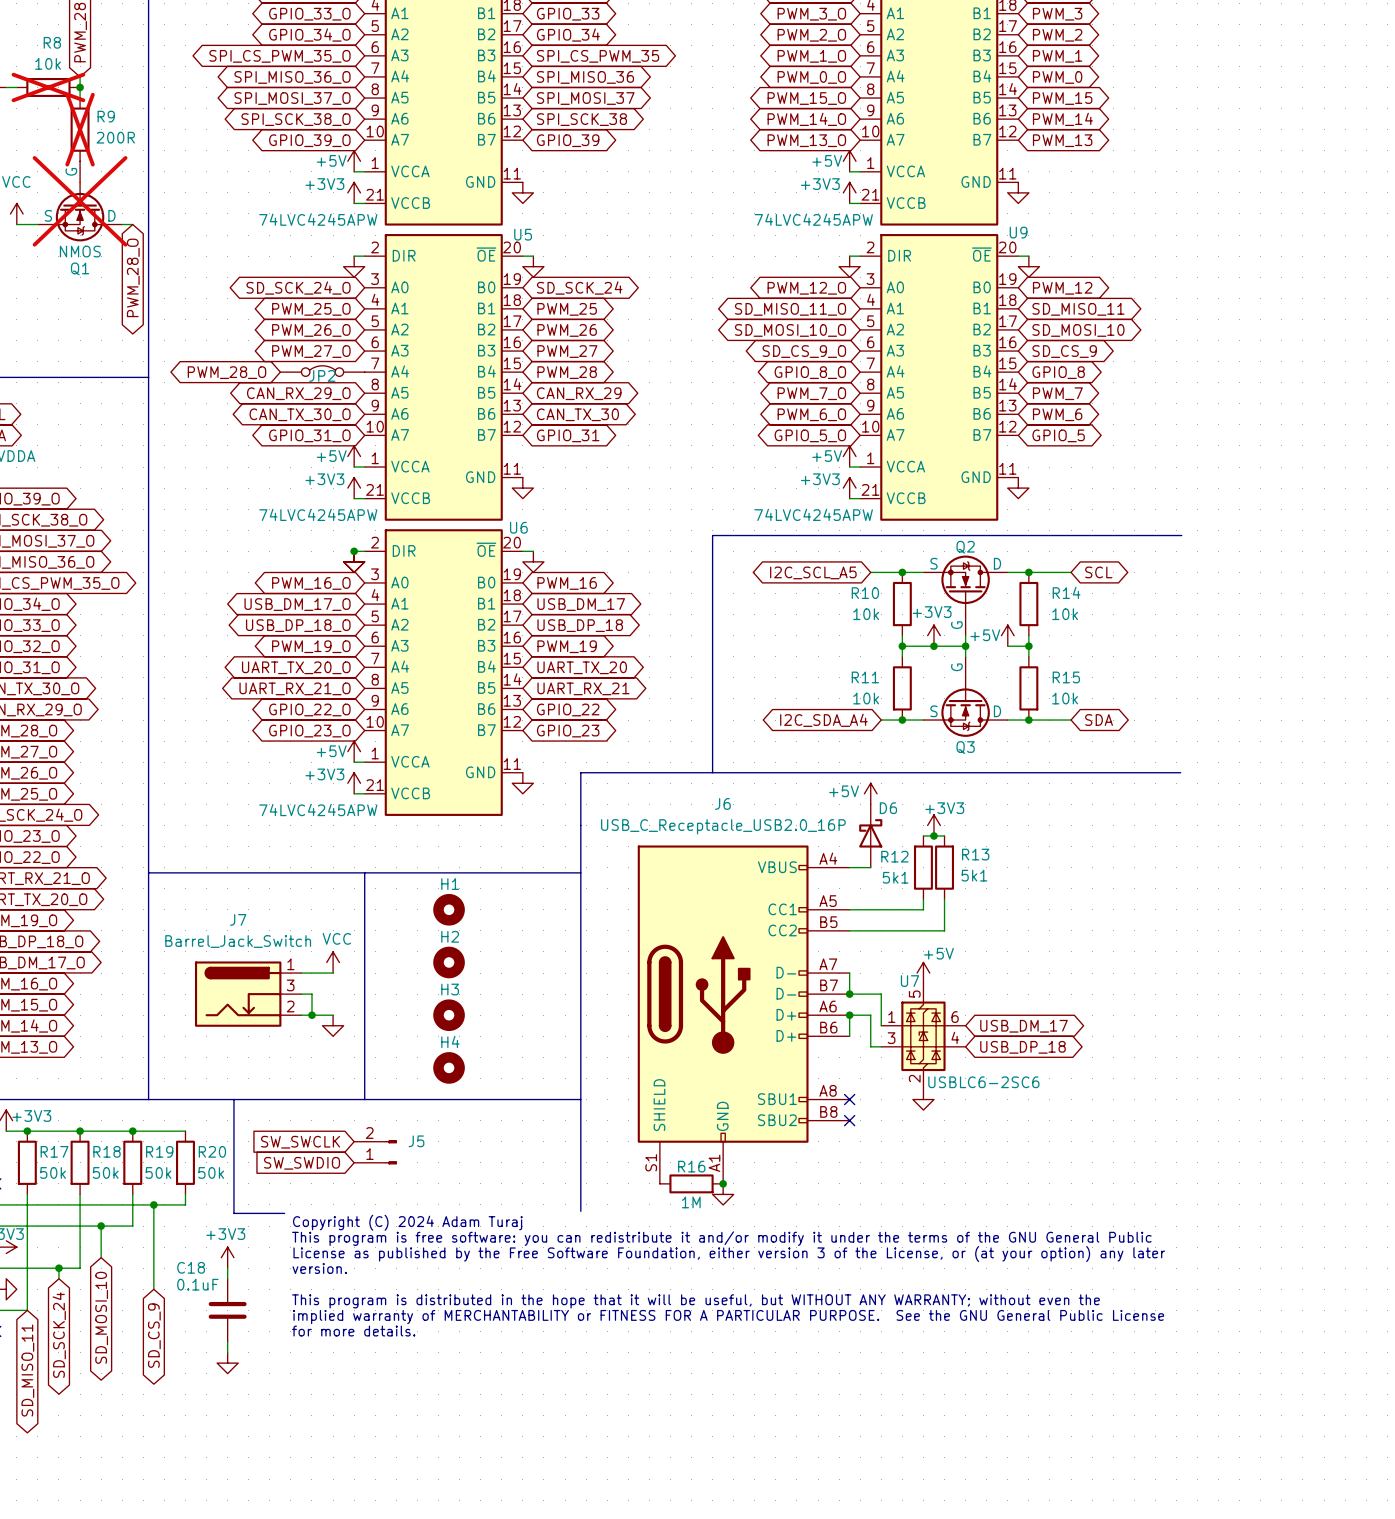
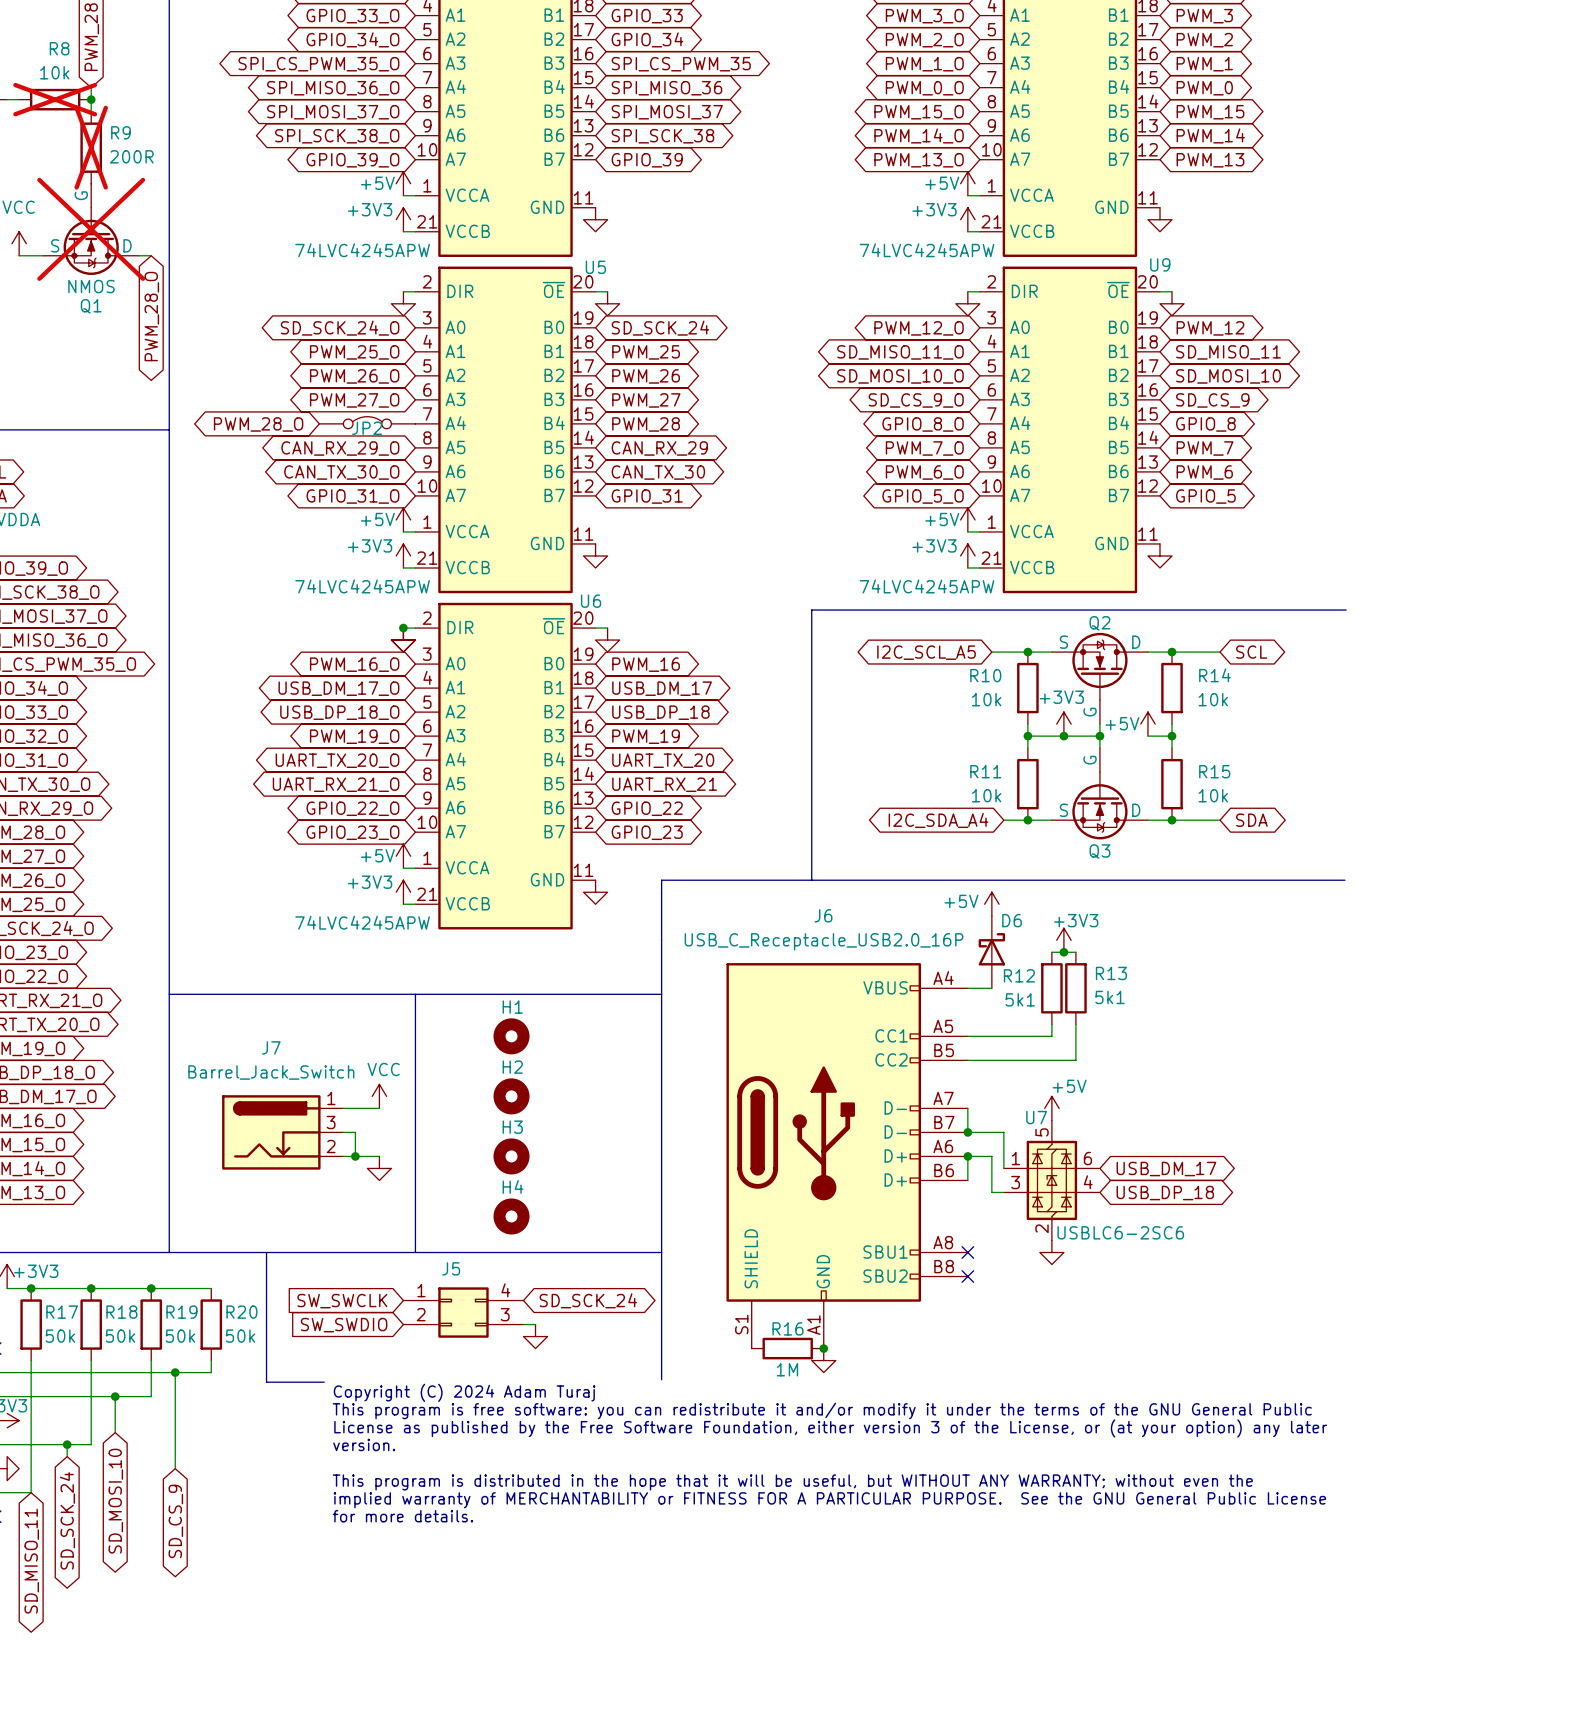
J5 symbol: [354, 1140, 397, 1165] -> [403, 1287, 524, 1338]
J5 name position: J5 (416, 1141) -> J5 (451, 1268)
global label: none -> SD_SCK_24 (588, 1300)
wire: none -> (523, 1324) (535, 1324)
power symbol: none -> (535, 1336)
power symbol: +3V3 (227, 1257) -> none
wire: (227, 1268) (227, 1278) -> none
C18: 0.1uF (227, 1310) -> none
wire: (227, 1342) (227, 1352) -> none
power symbol: (227, 1363) -> none

